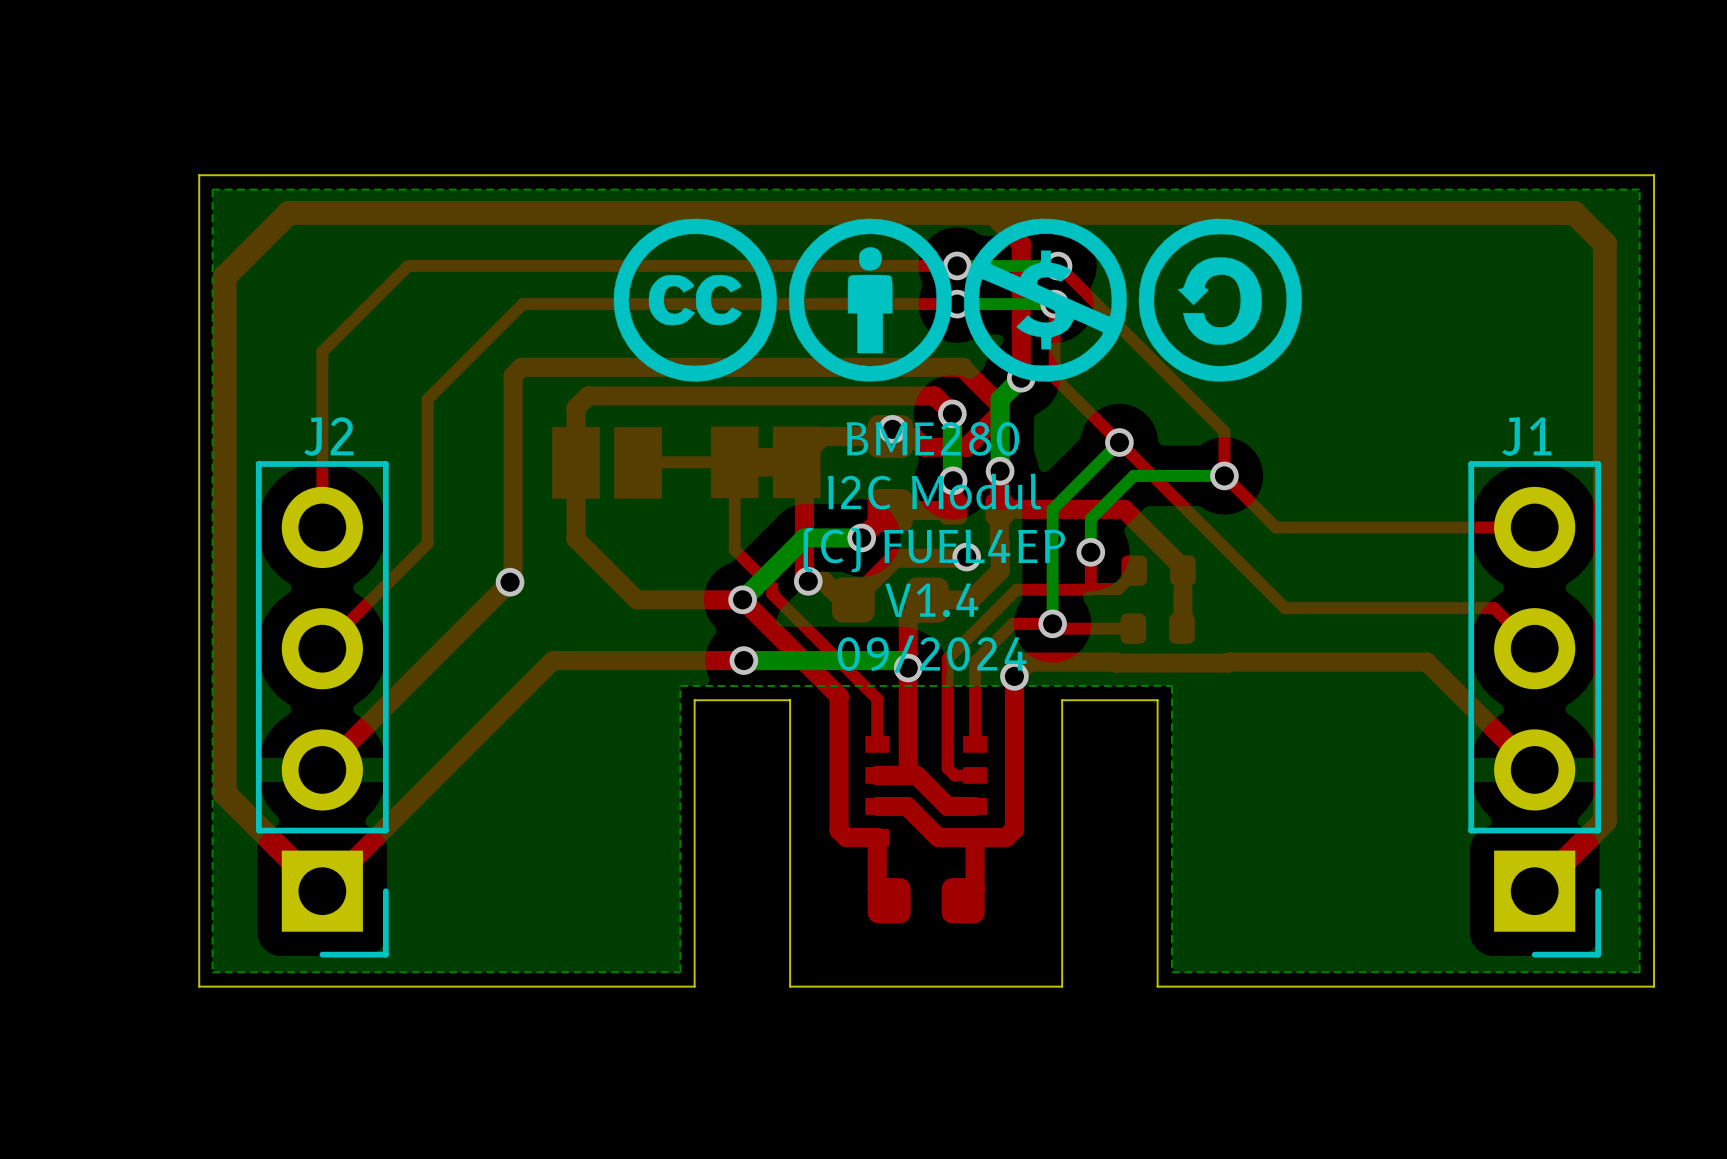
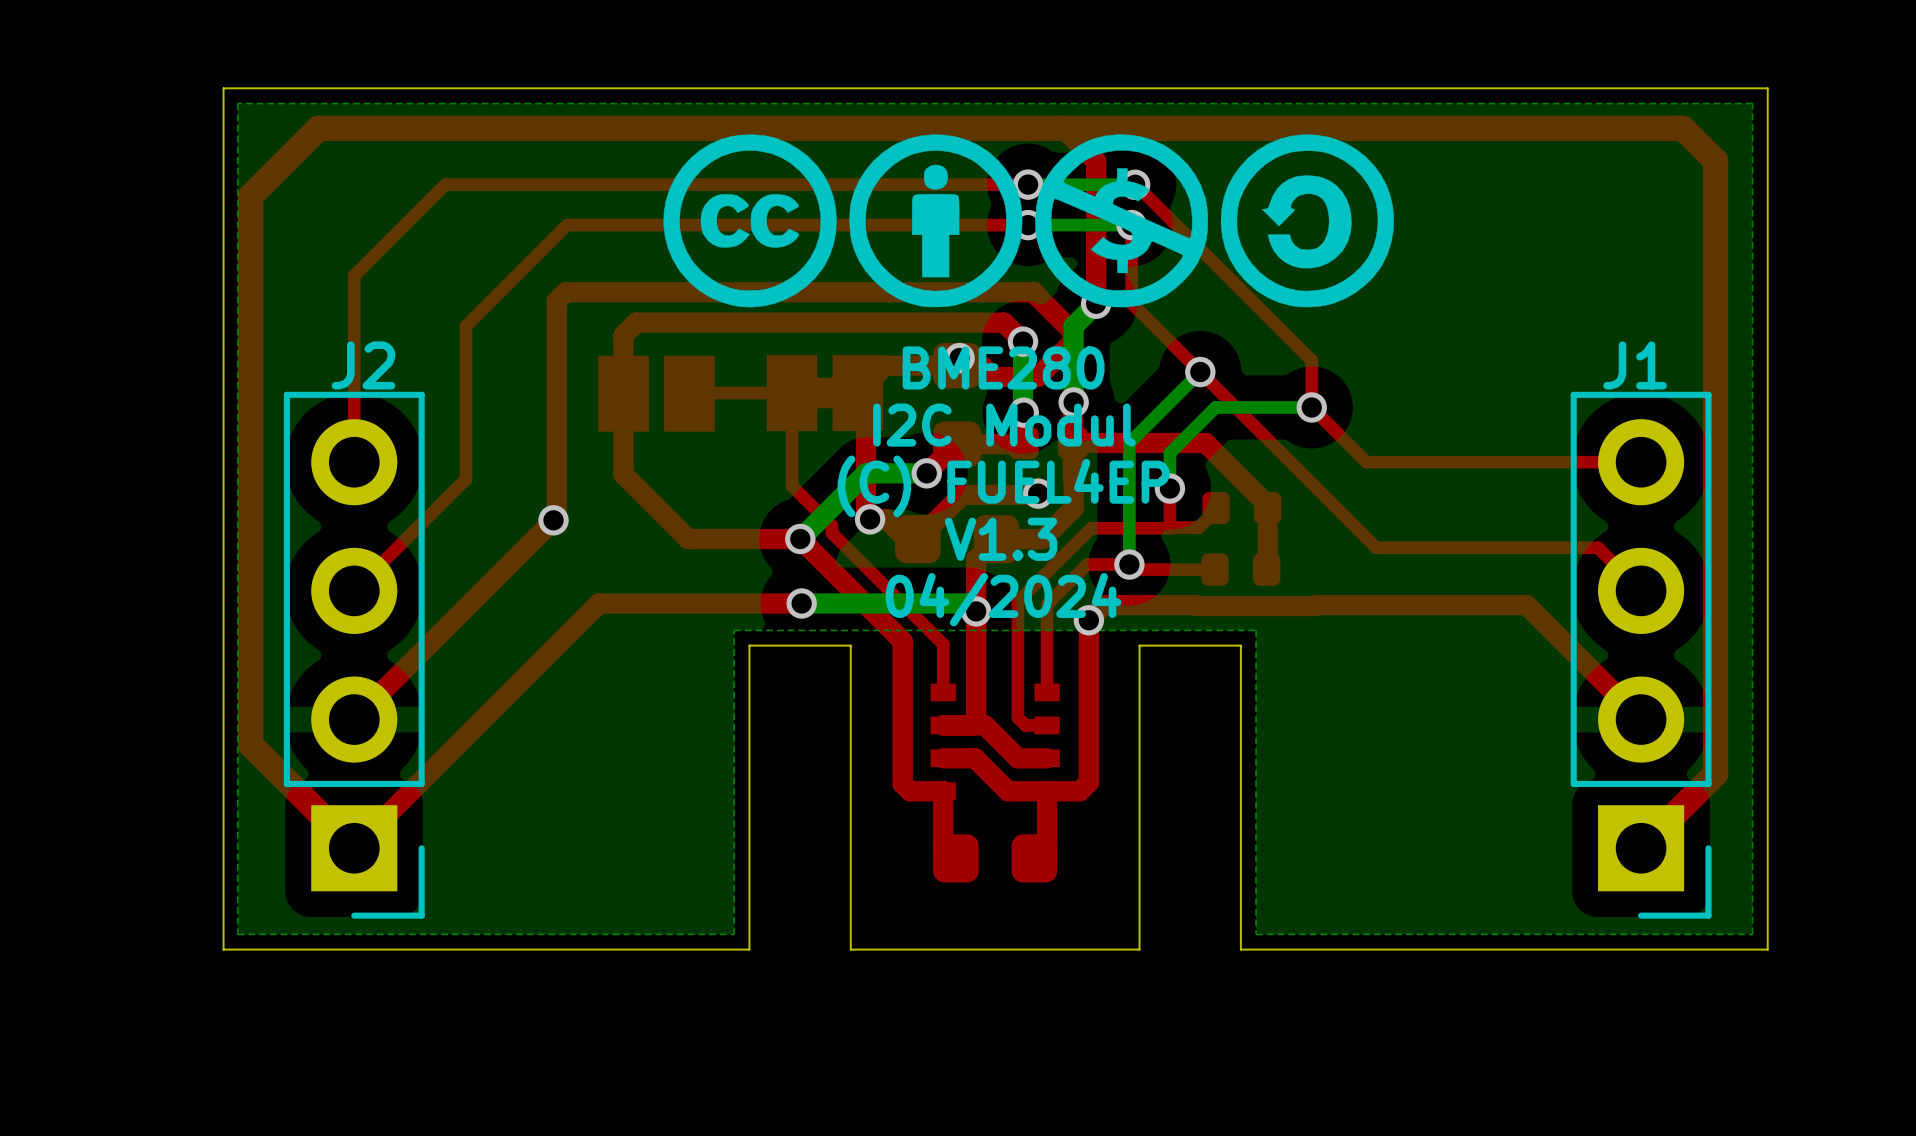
text: V1.4 (931, 600) -> V1.3 (1001, 539)
text: 09/2024 (932, 654) -> 04/2024 (1003, 599)

